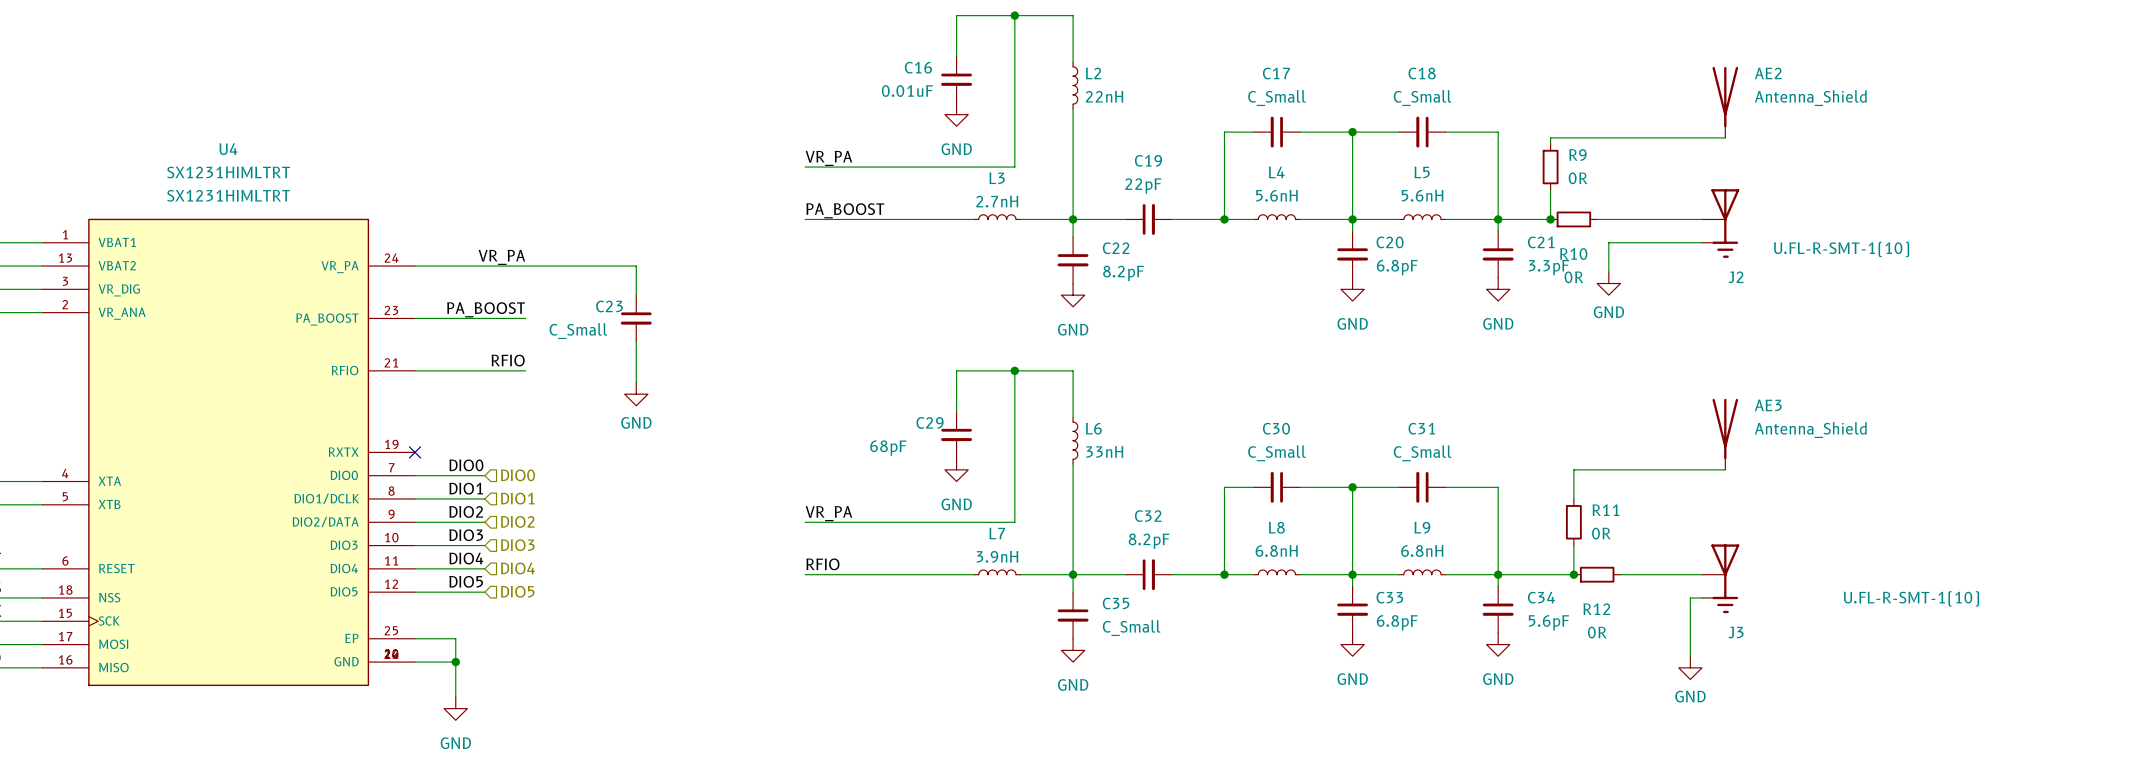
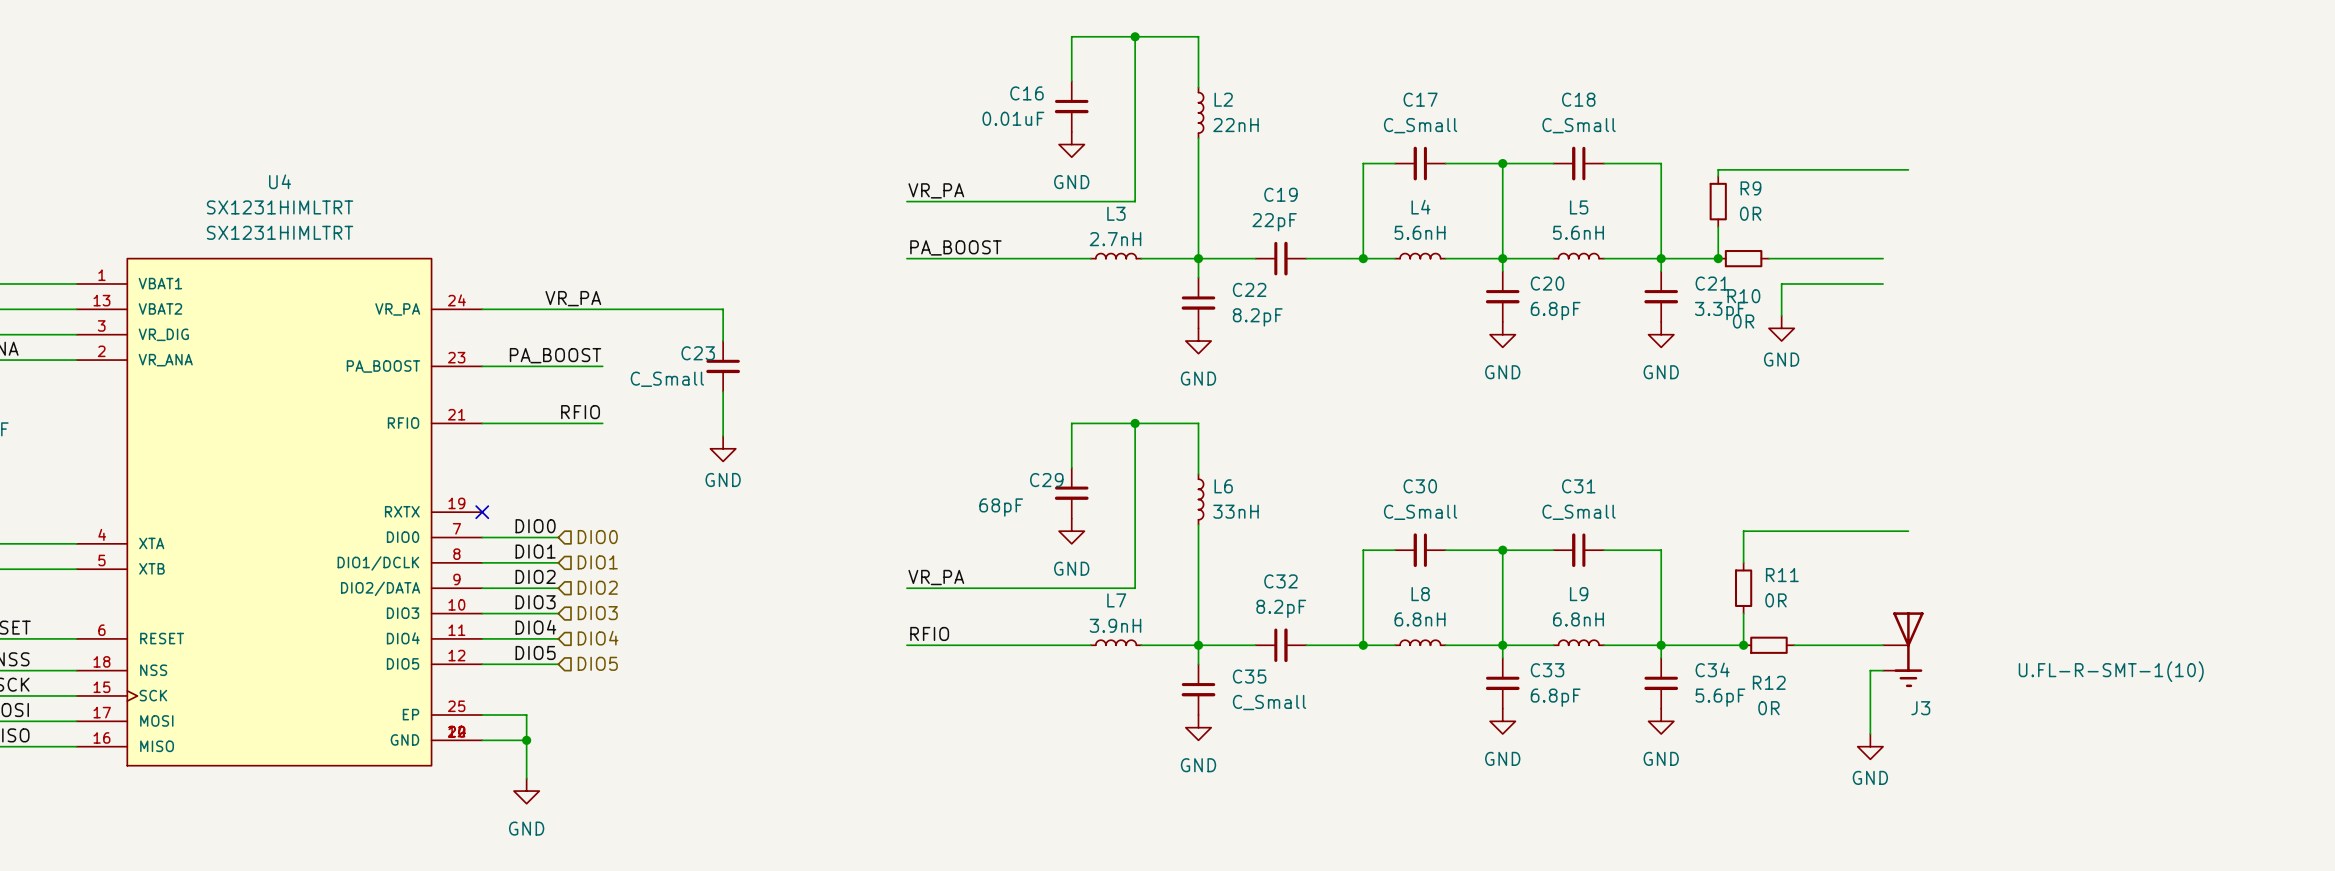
AE2: Antenna_Shield (1725, 102) -> none
J2: U.FL-R-SMT-1(10) (1720, 223) -> none
AE3: Antenna_Shield (1725, 434) -> none

